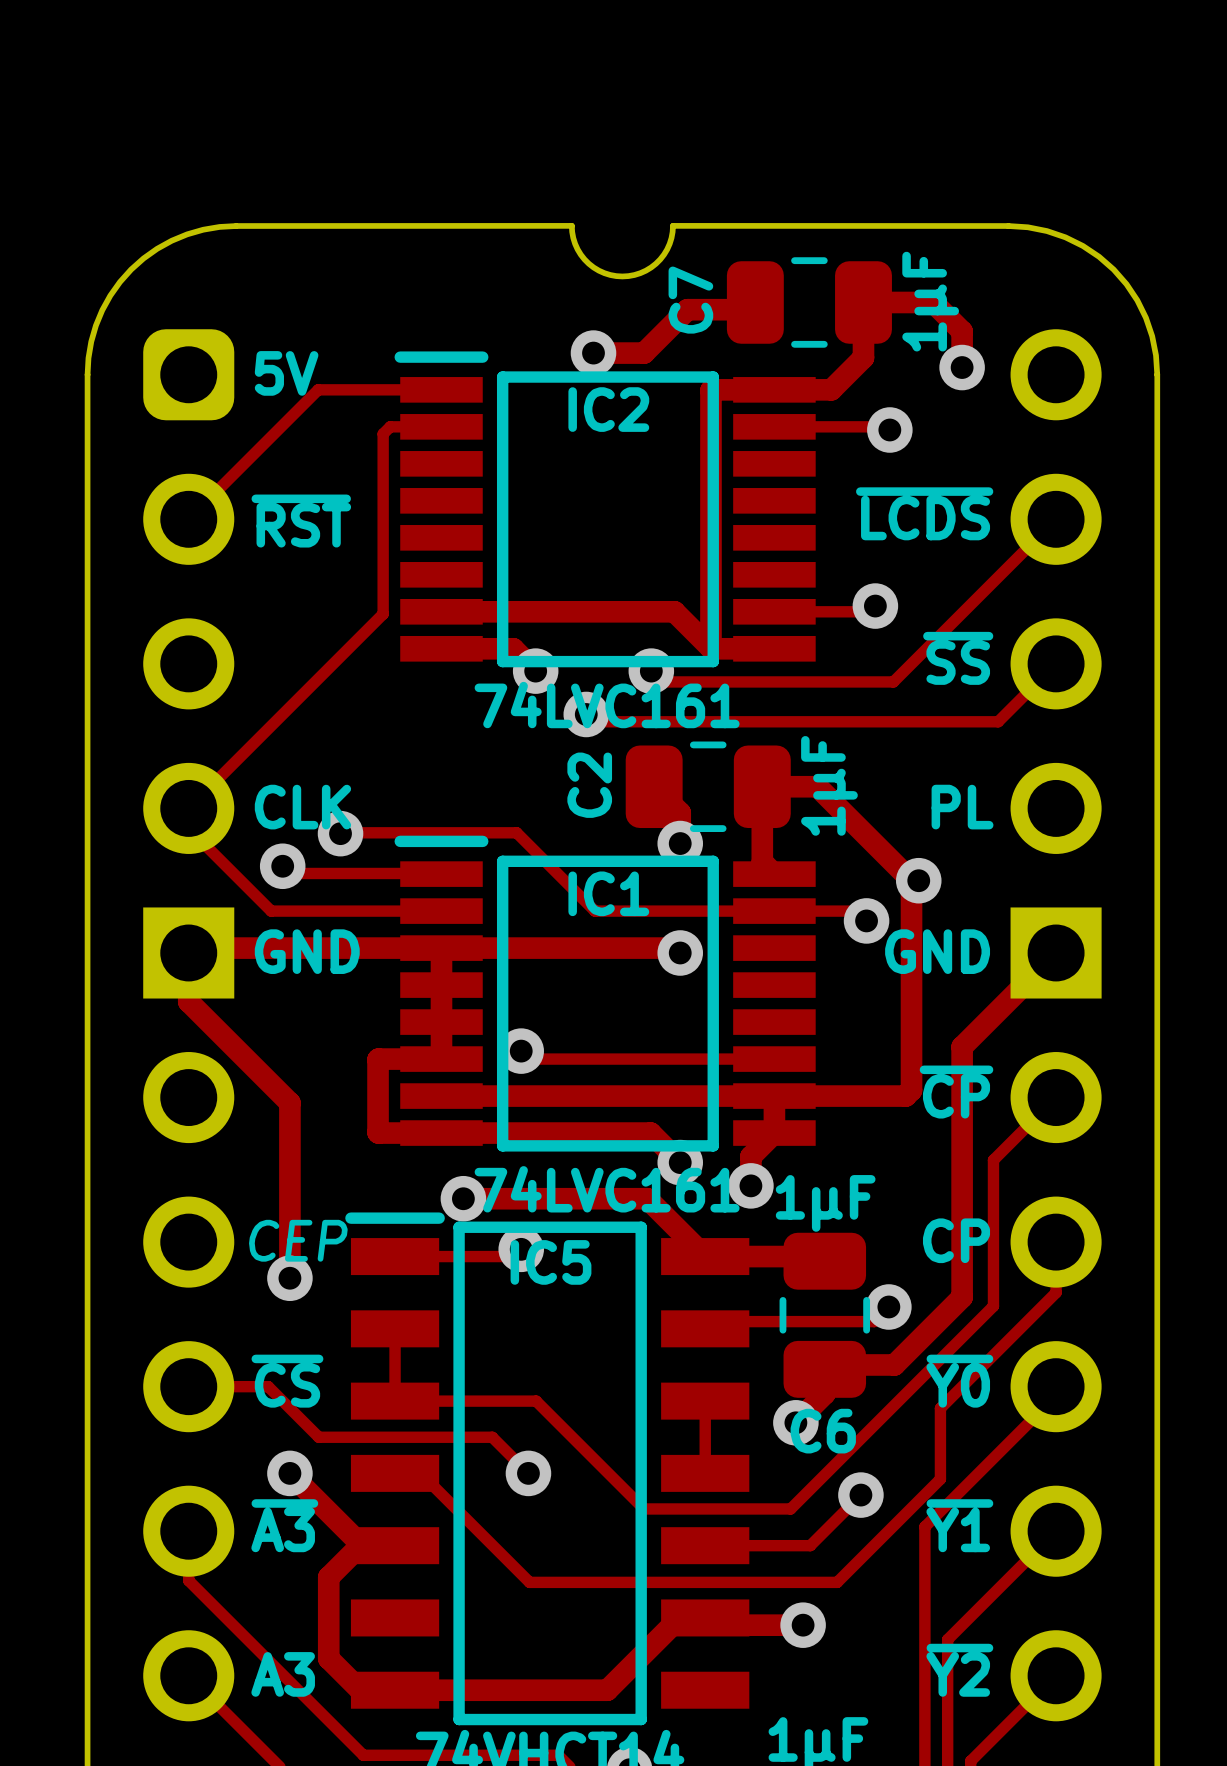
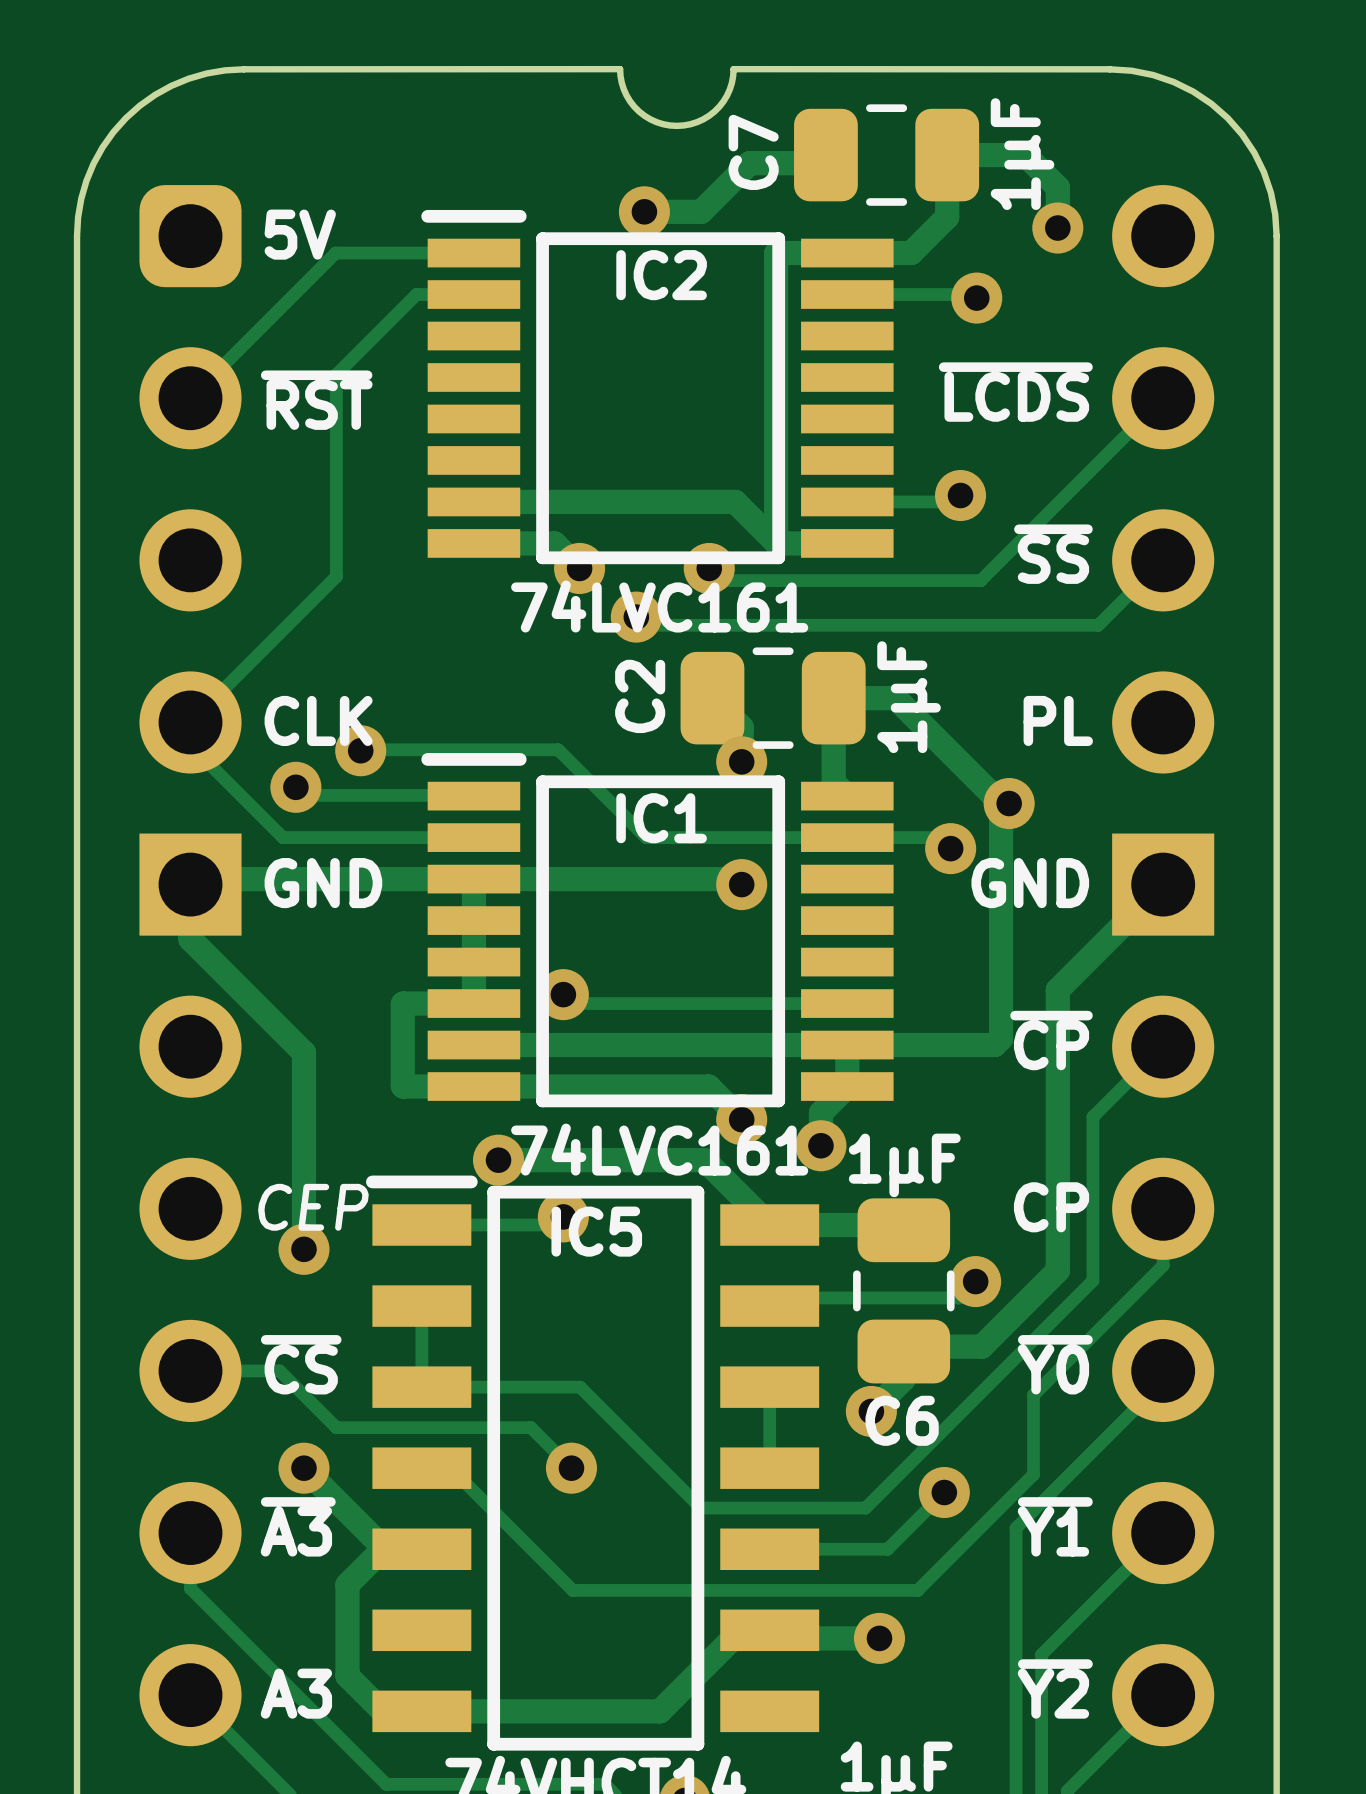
track: (383, 433) (383, 614) (318, 678) -> (408, 302) (336, 374) (336, 576)

